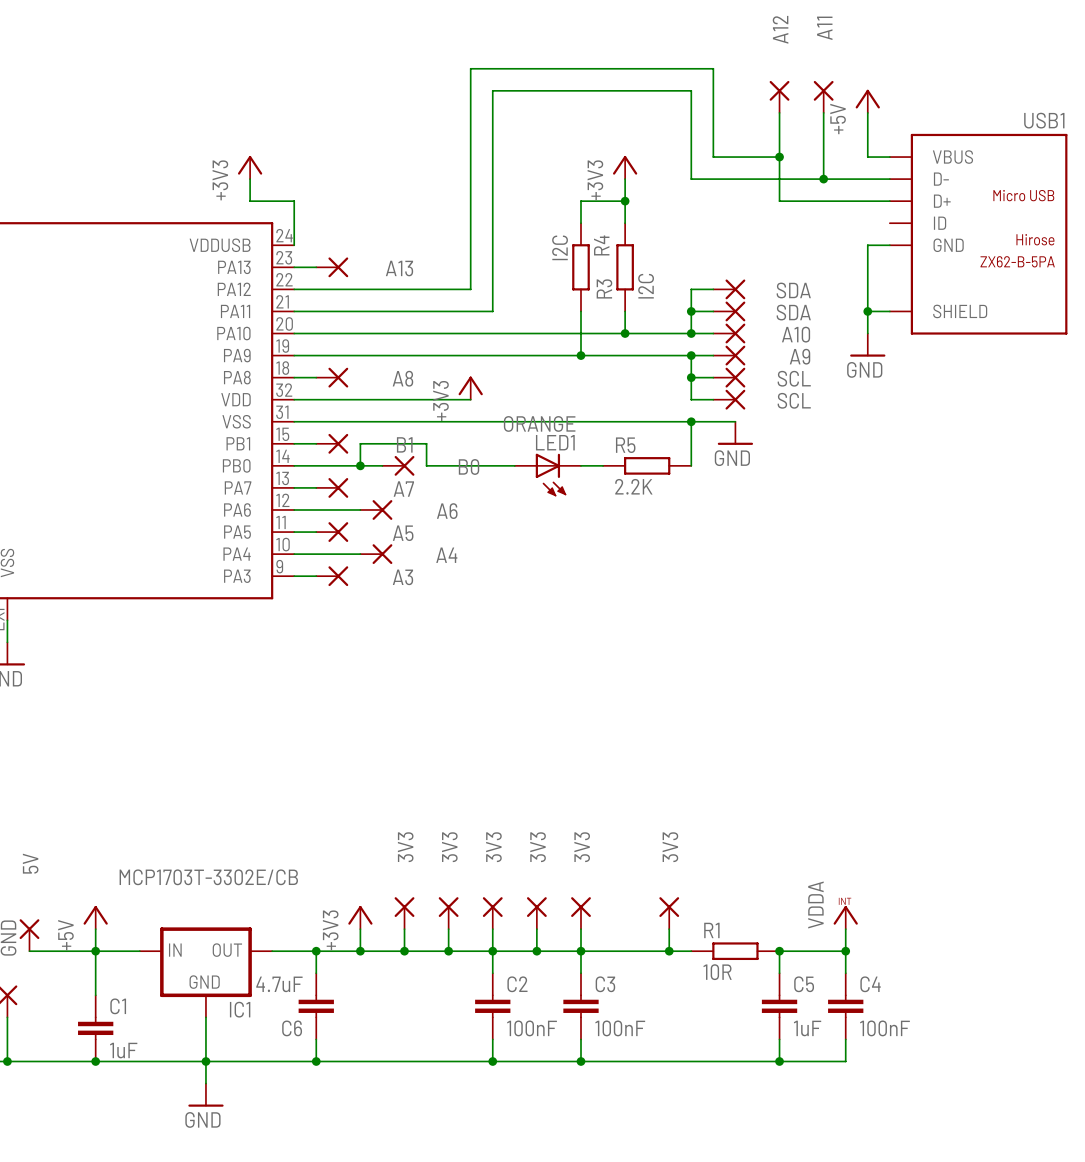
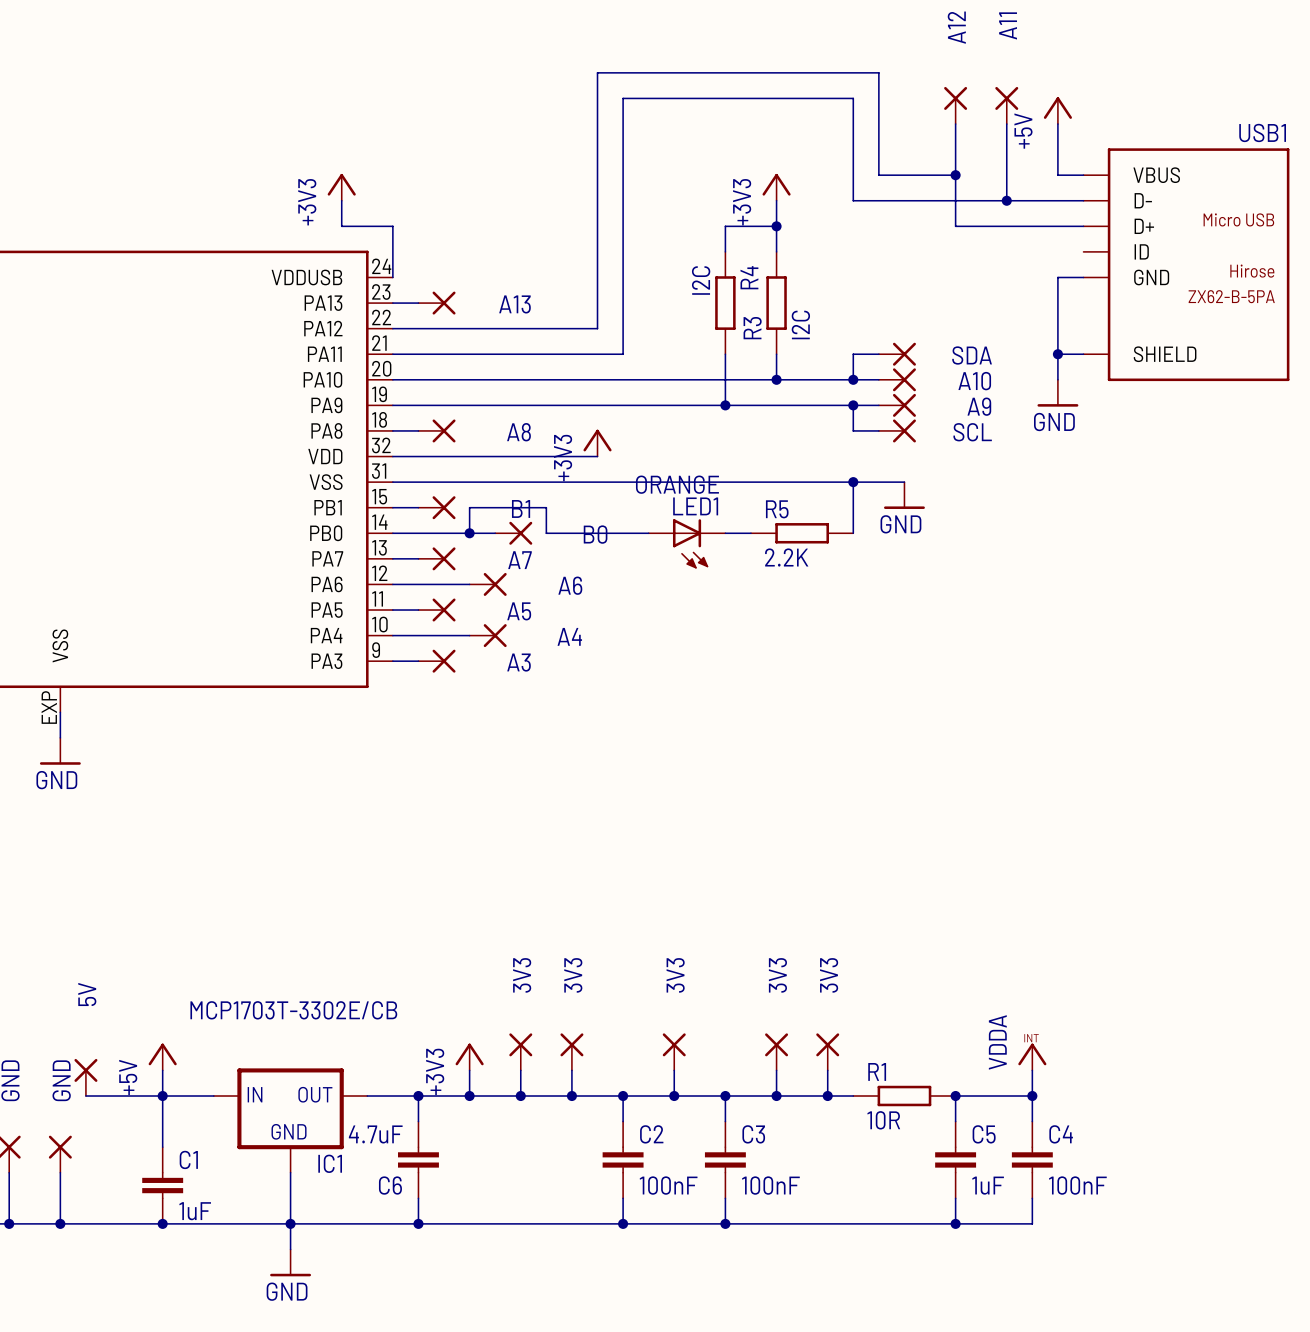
wire: (713, 289) (691, 289) (691, 311) -> none
part: SDA (729, 289) -> none
junction: (691, 311) -> none
wire: (691, 377) (691, 399) (713, 399) -> none
junction: (691, 377) -> none
part: SCL (729, 399) -> none
part: 3V3 (492, 913) -> none
part position: (580, 913) -> (776, 1051)
wire: (492, 929) (492, 951) -> none
wire: (580, 929) (580, 951) -> (776, 1070) (776, 1096)
junction: none -> (776, 1096)

